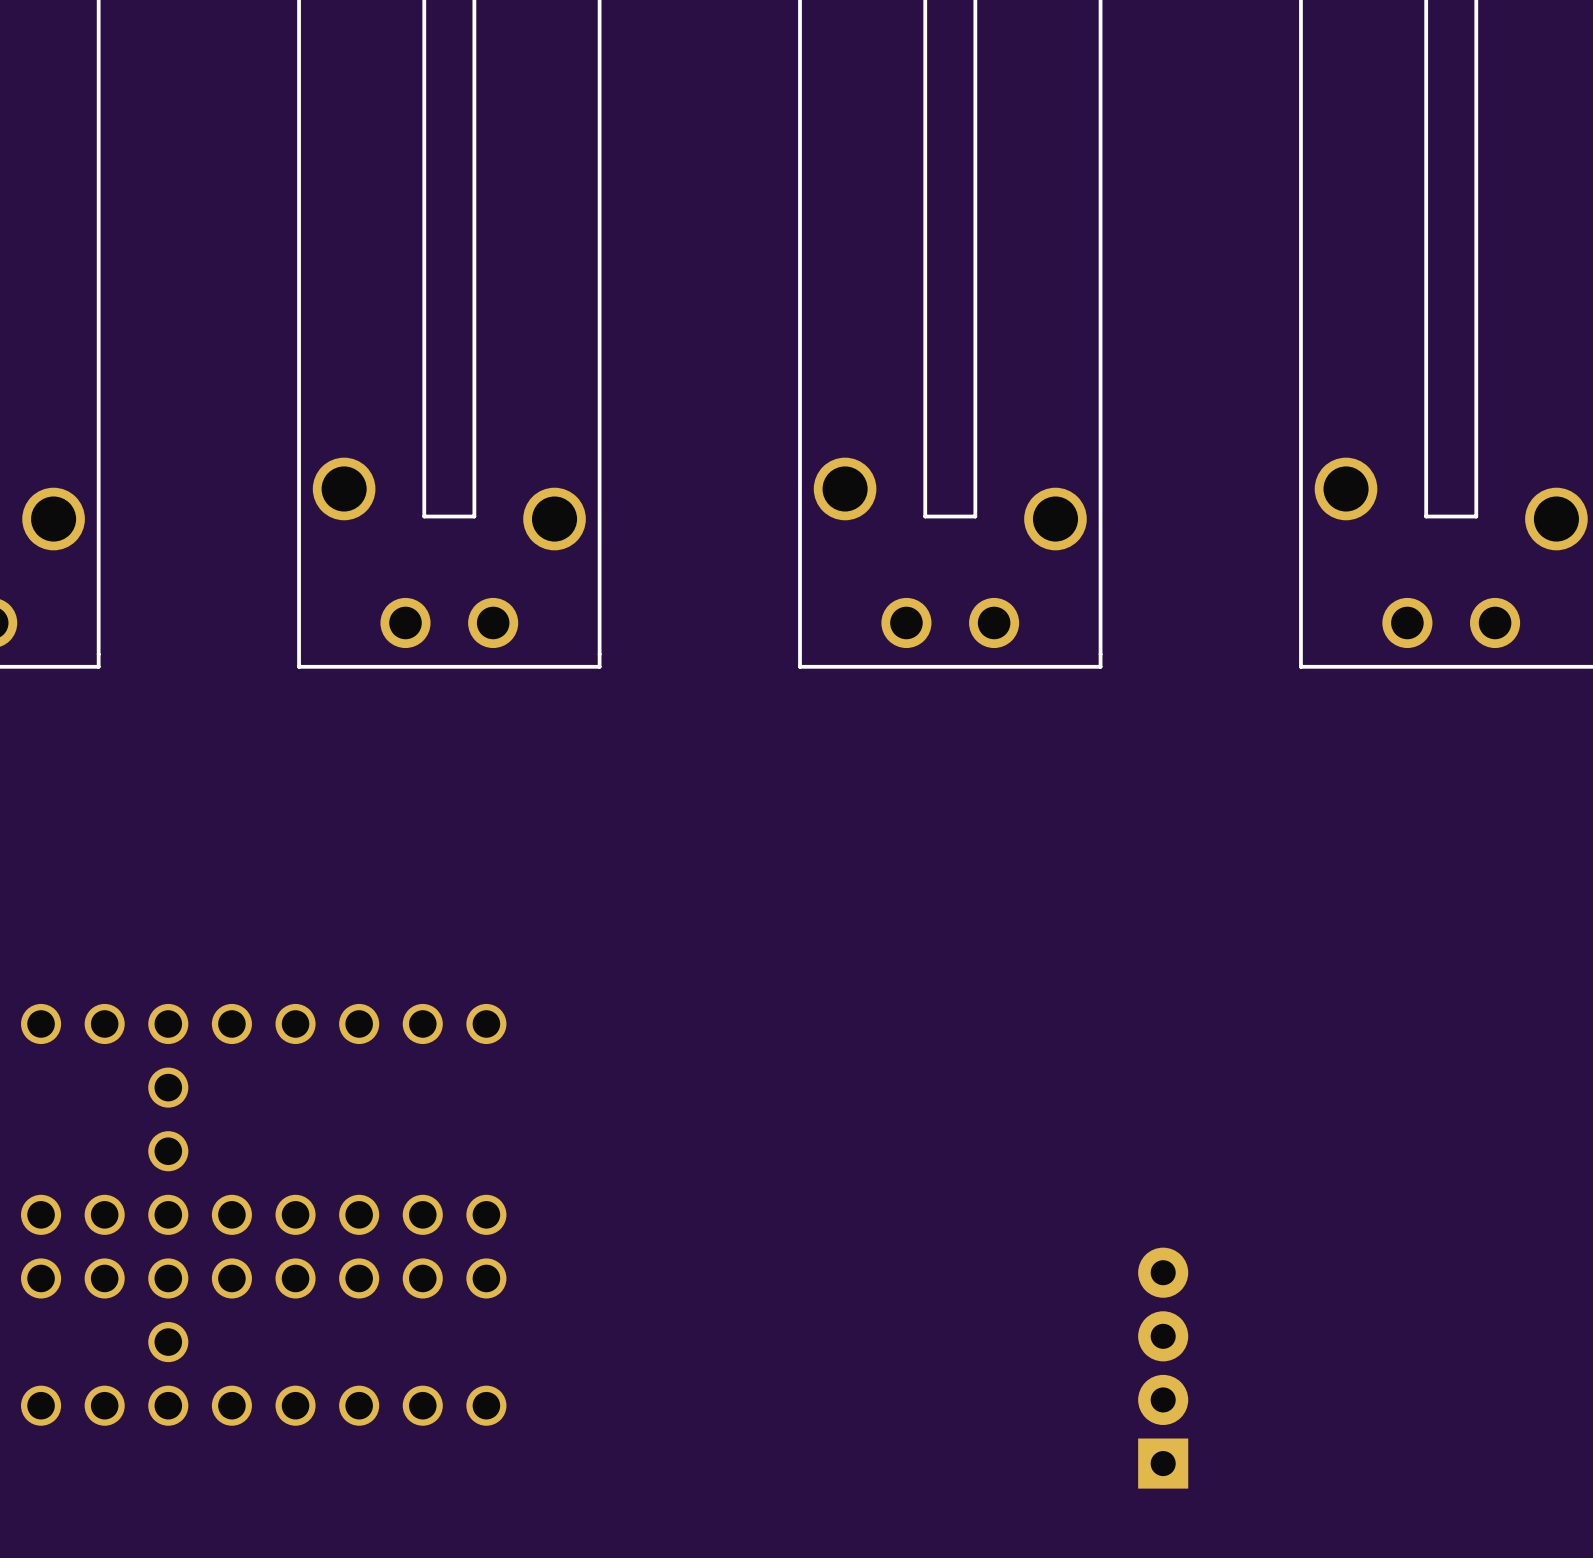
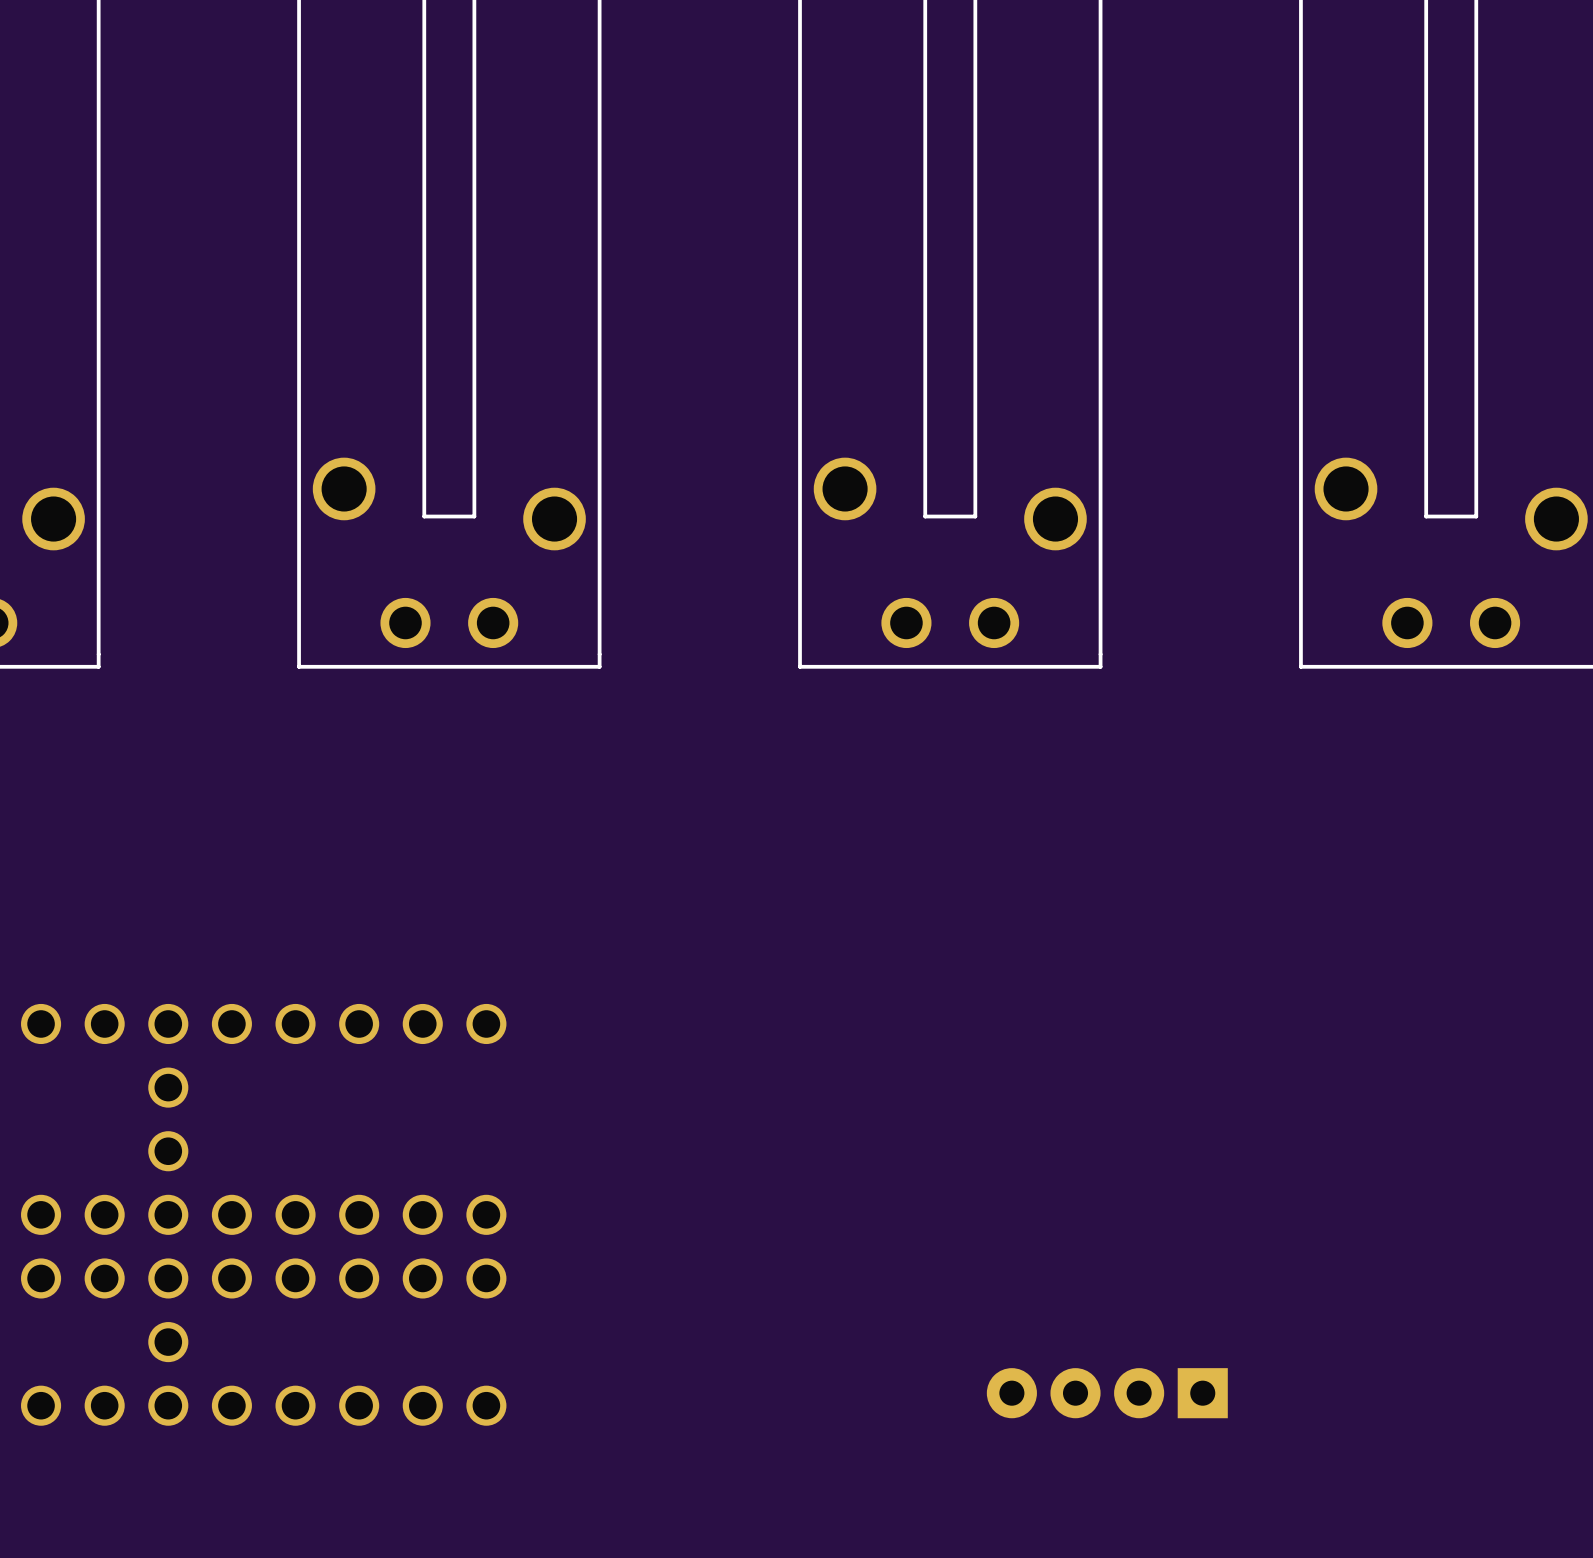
part rotation: 0° (1163, 1368) -> 90° counterclockwise (1107, 1393)

